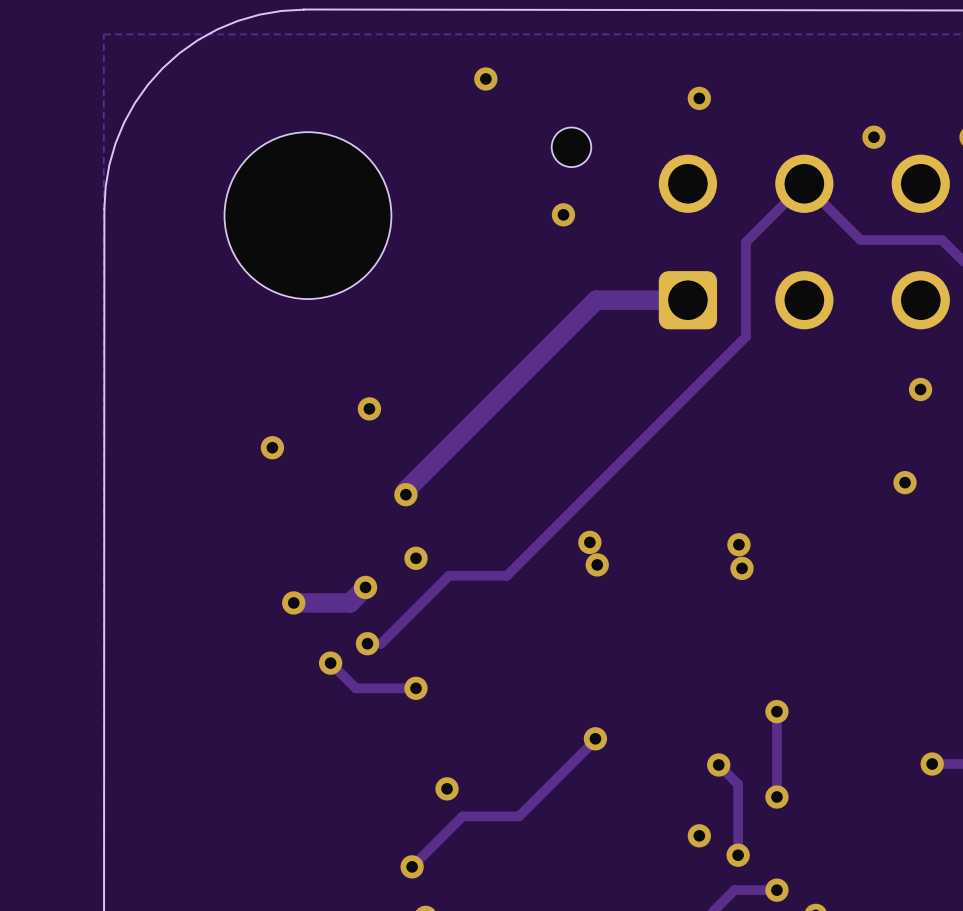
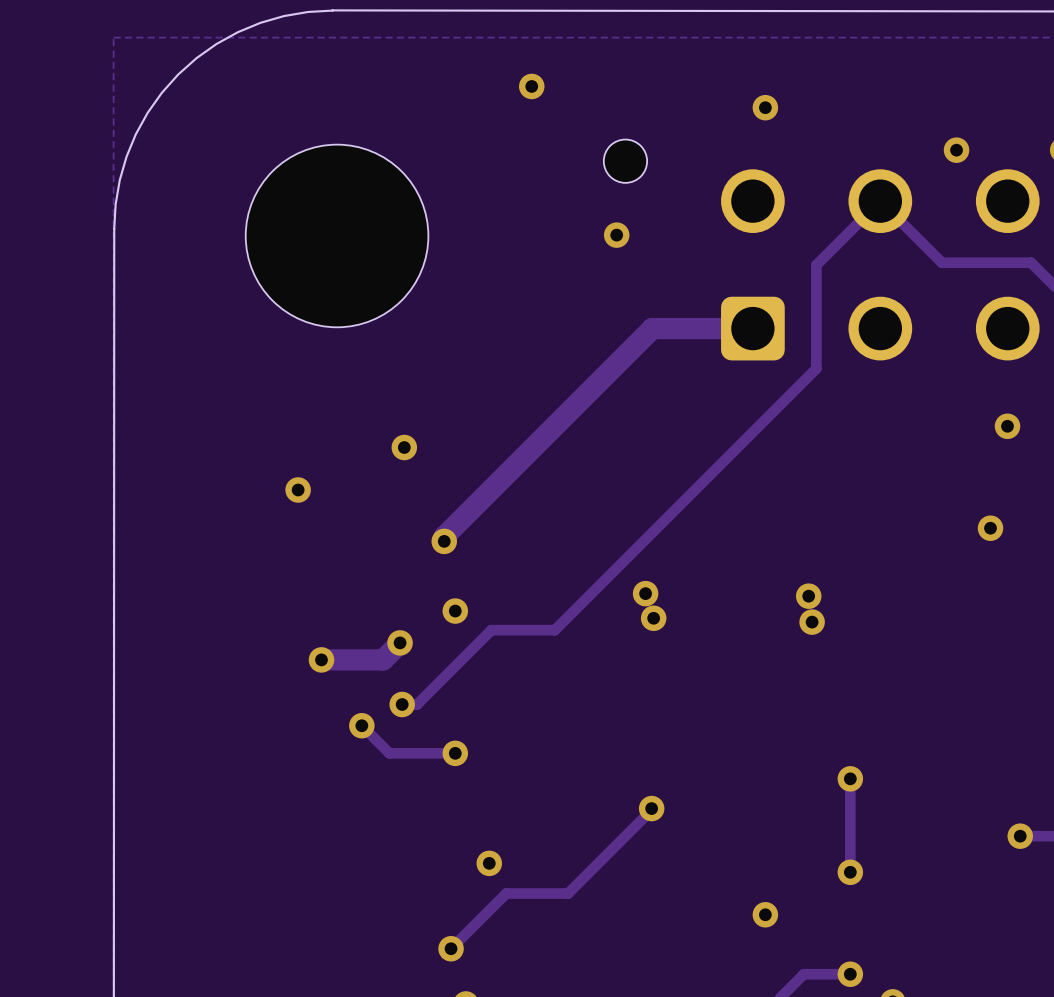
track: (718, 764) (738, 784) (738, 855) -> none
via: (718, 764) -> none
via: (738, 855) -> none

